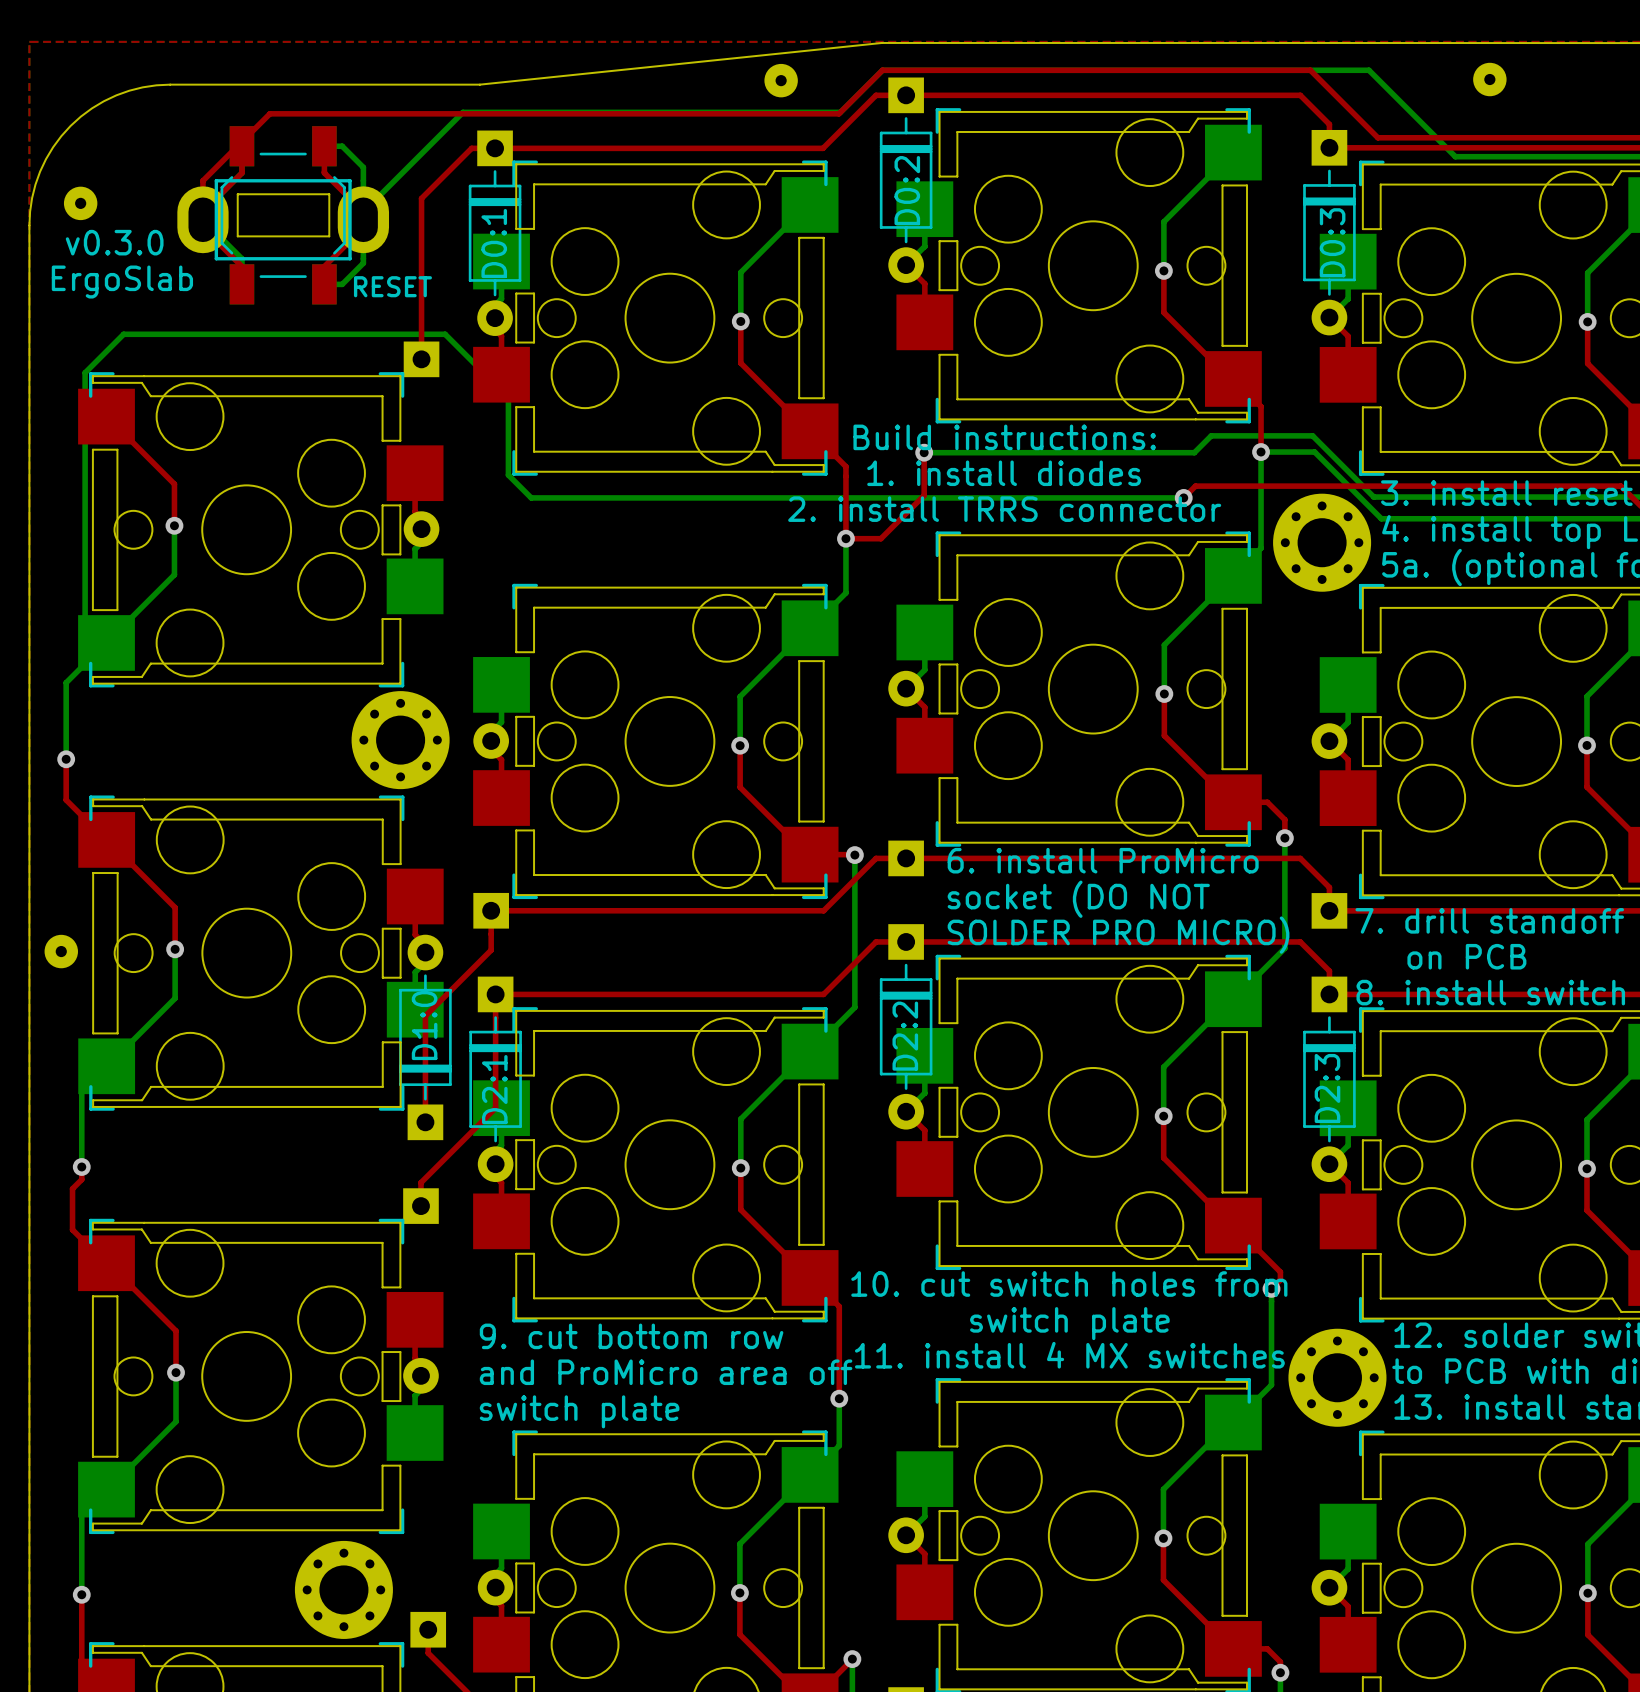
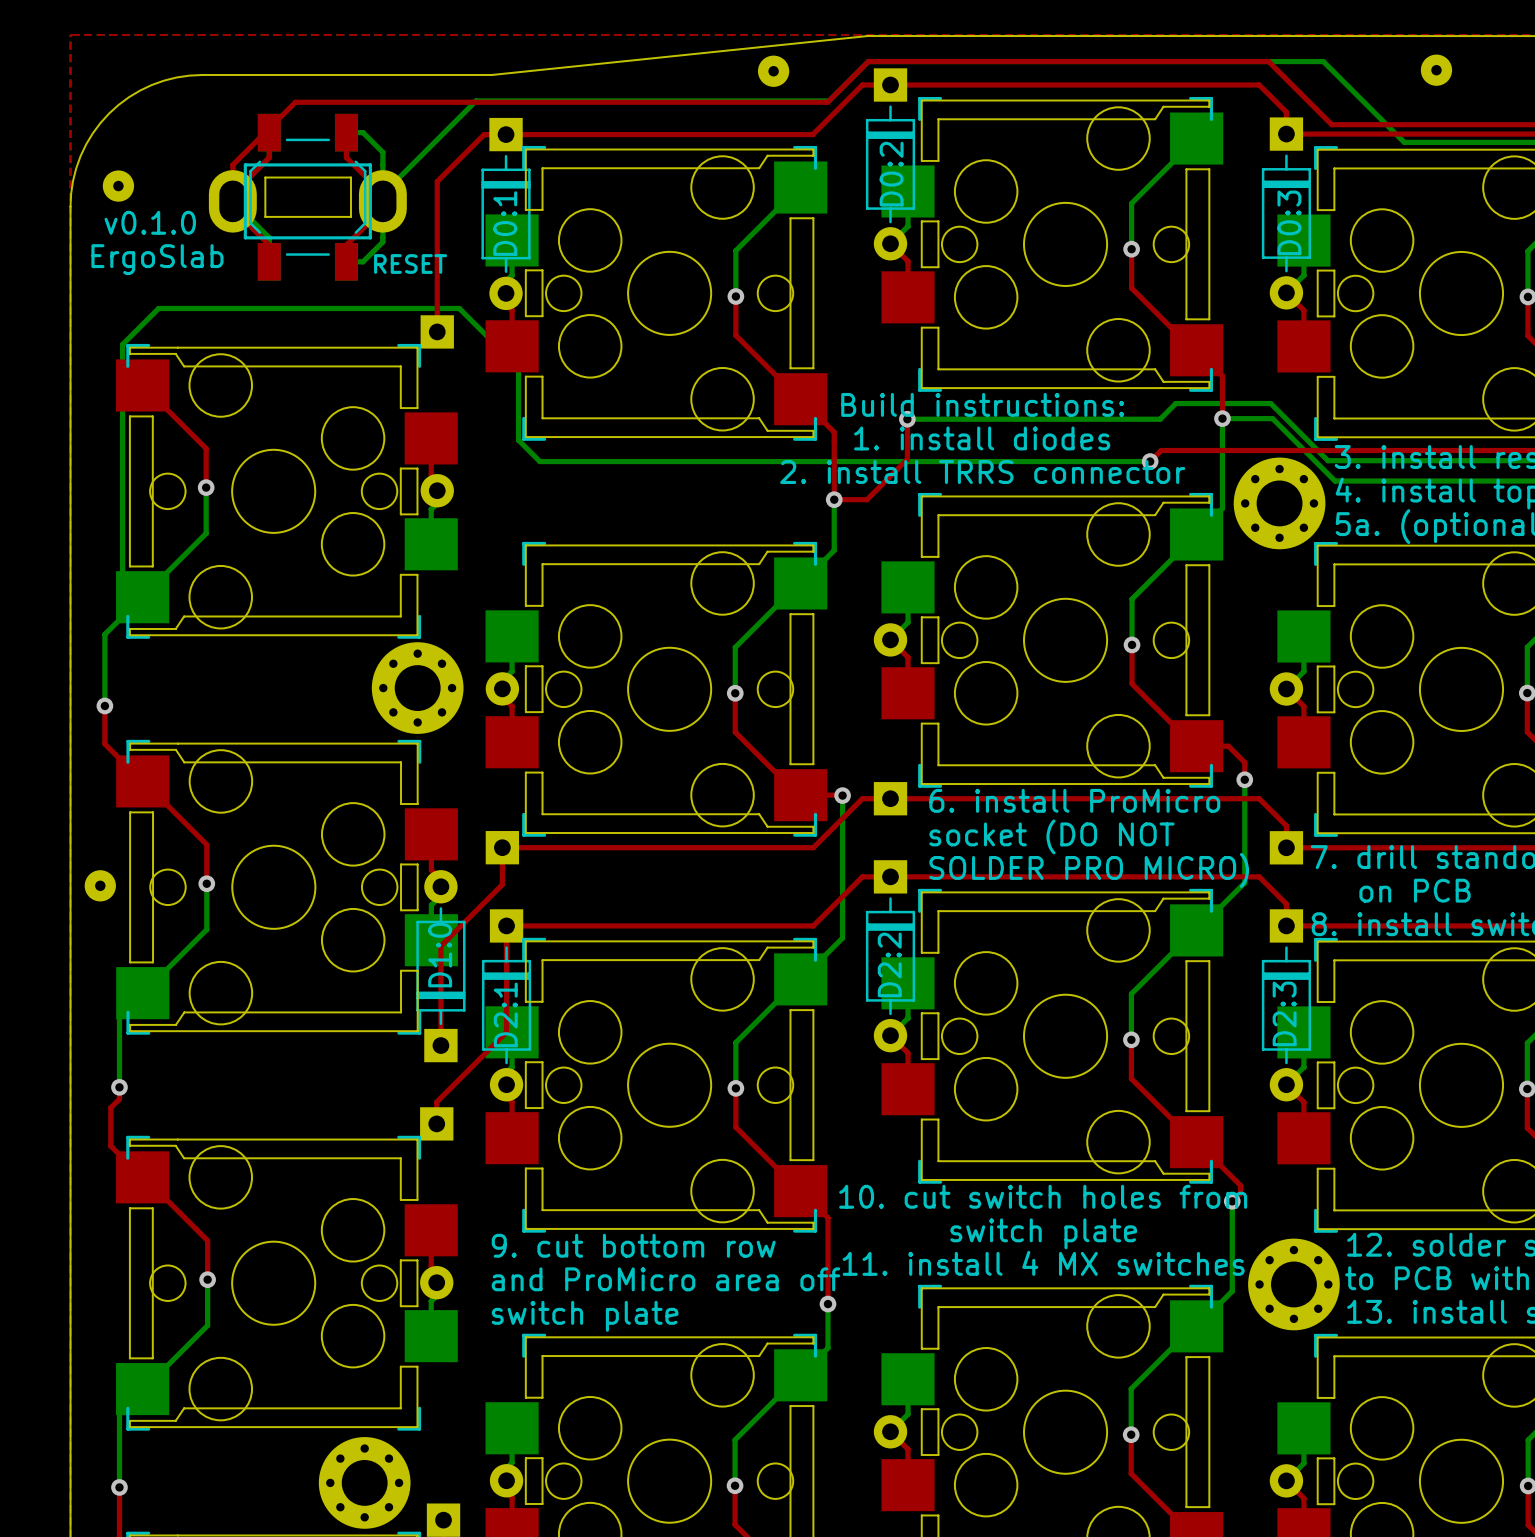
text: v0.3.0 (114, 242) -> v0.1.0 (150, 222)

